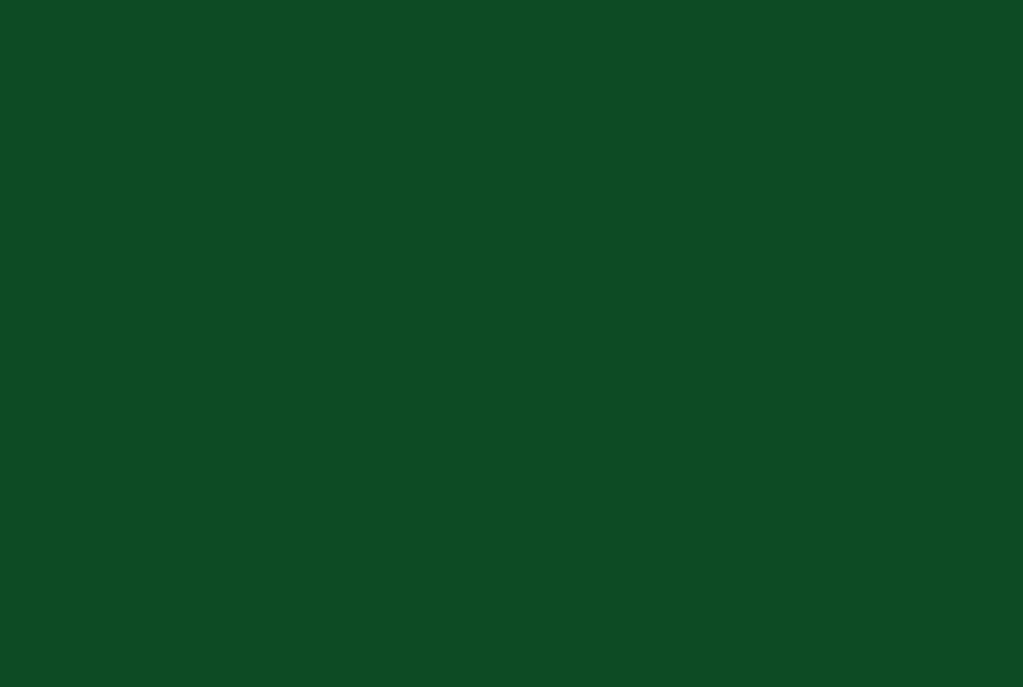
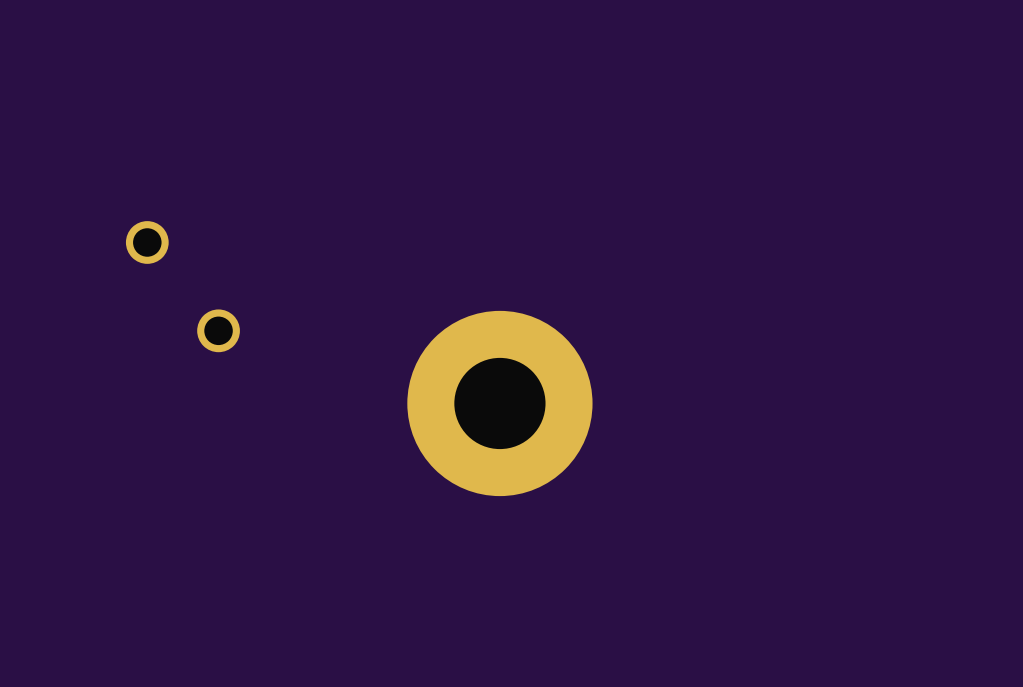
part: none -> (147, 242)
part: none -> (218, 330)
part: none -> (499, 403)

